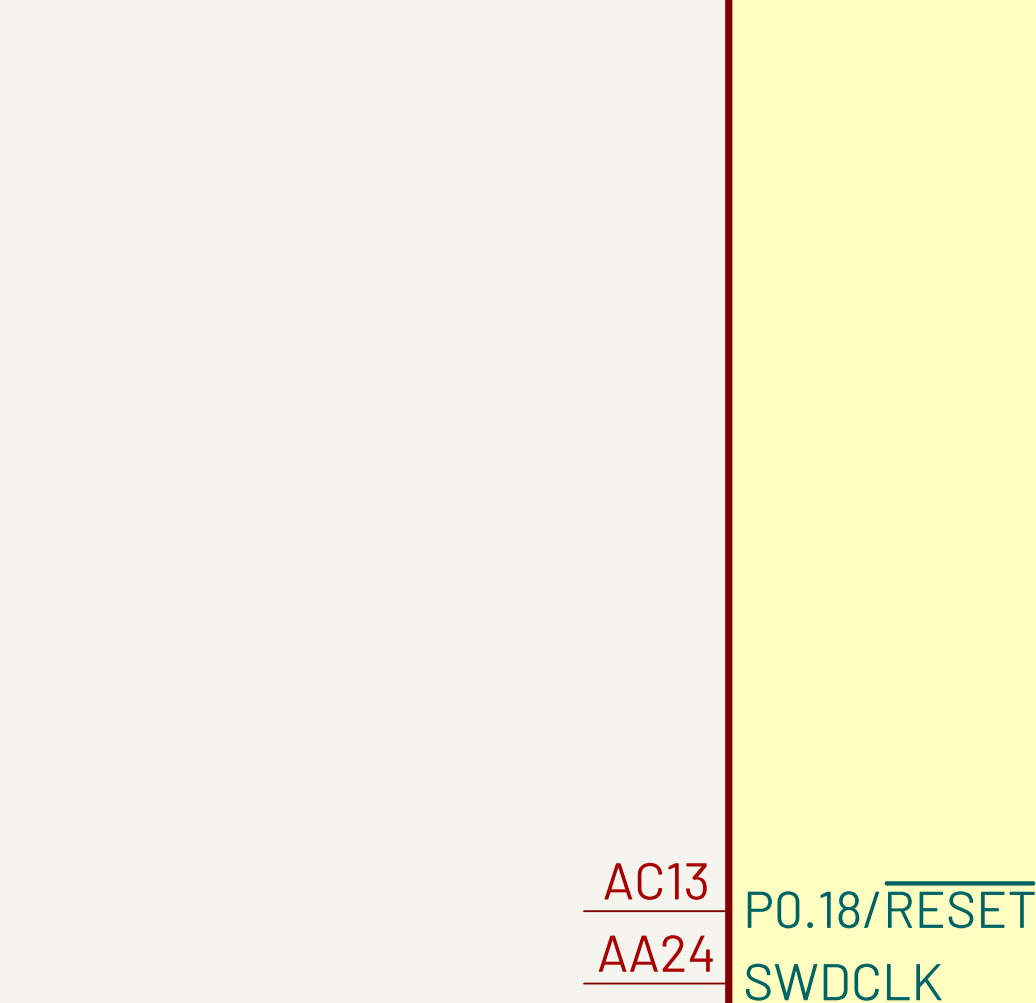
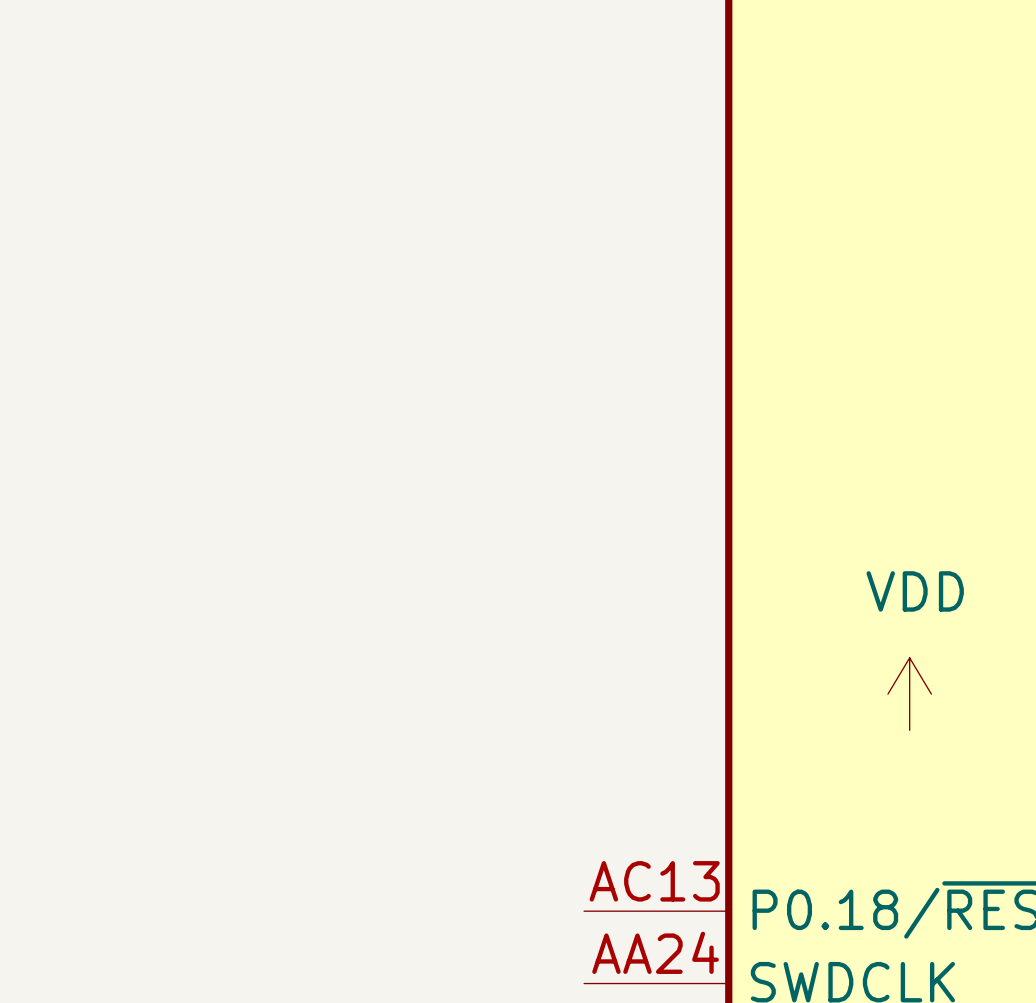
power symbol: none -> VDD (909, 694)

